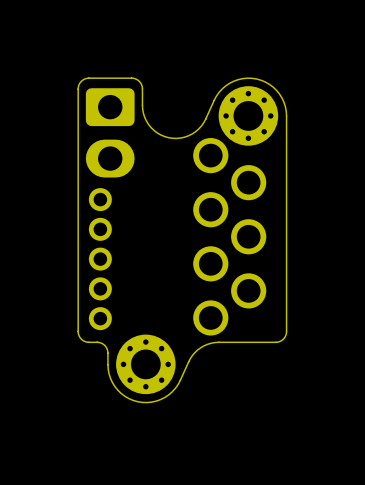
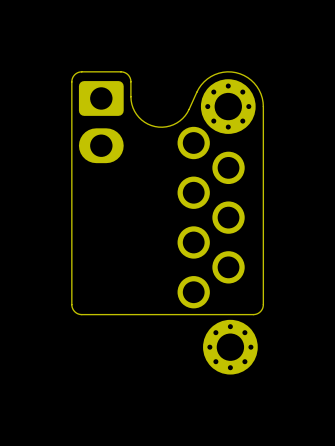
part: (100, 259) -> none
board edge: (218, 342) (204, 345) (195, 352) (178, 384) (168, 394) (160, 399) (147, 402) (129, 398) (117, 390) (109, 373) (106, 348) (102, 343) (97, 342) -> (201, 314) (89, 314)
part position: (145, 364) -> (230, 347)

